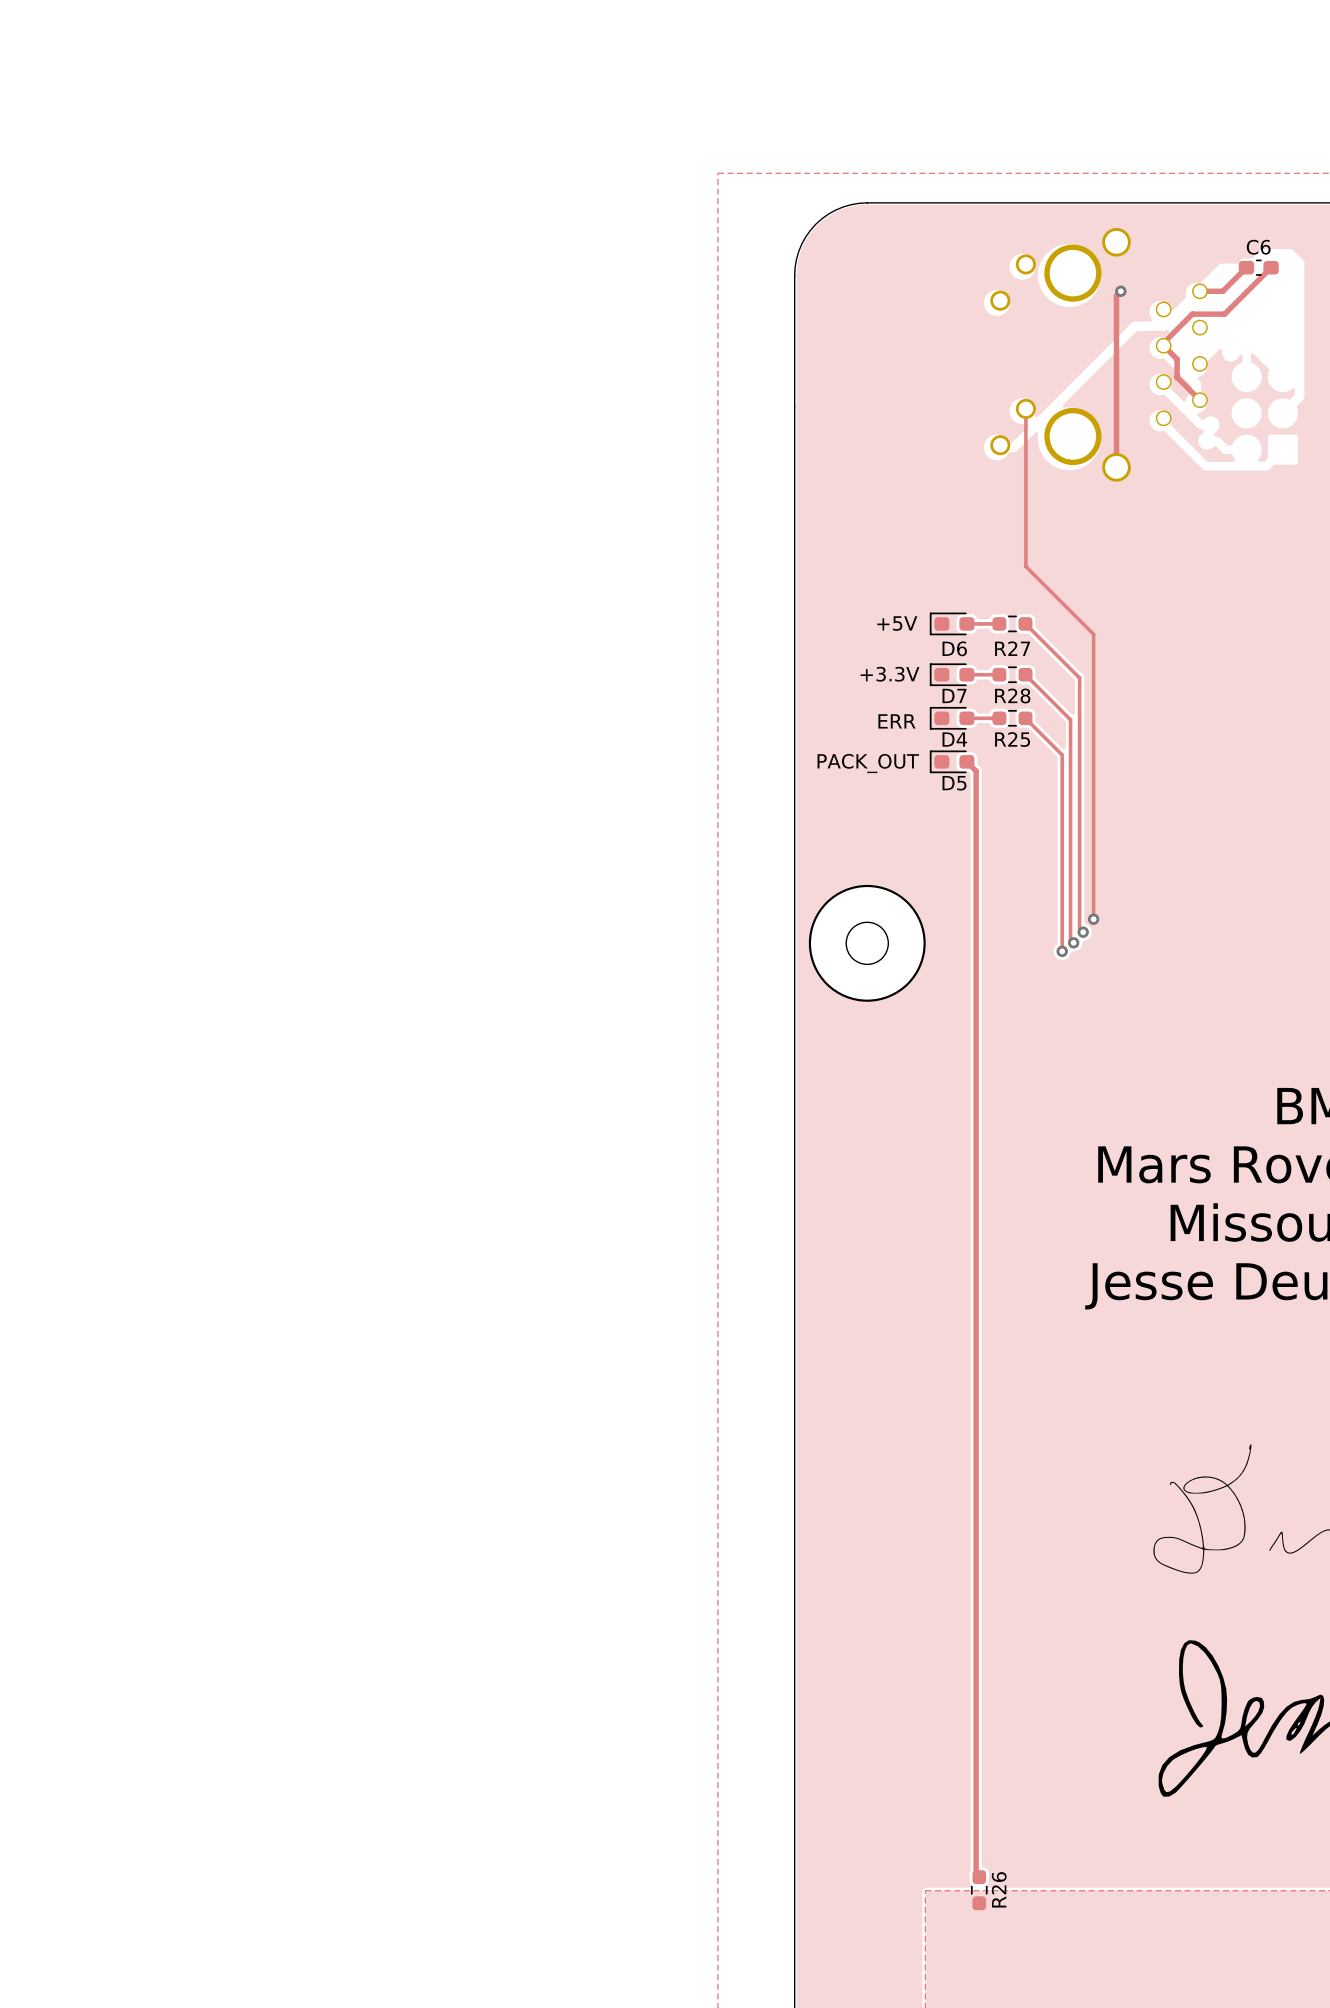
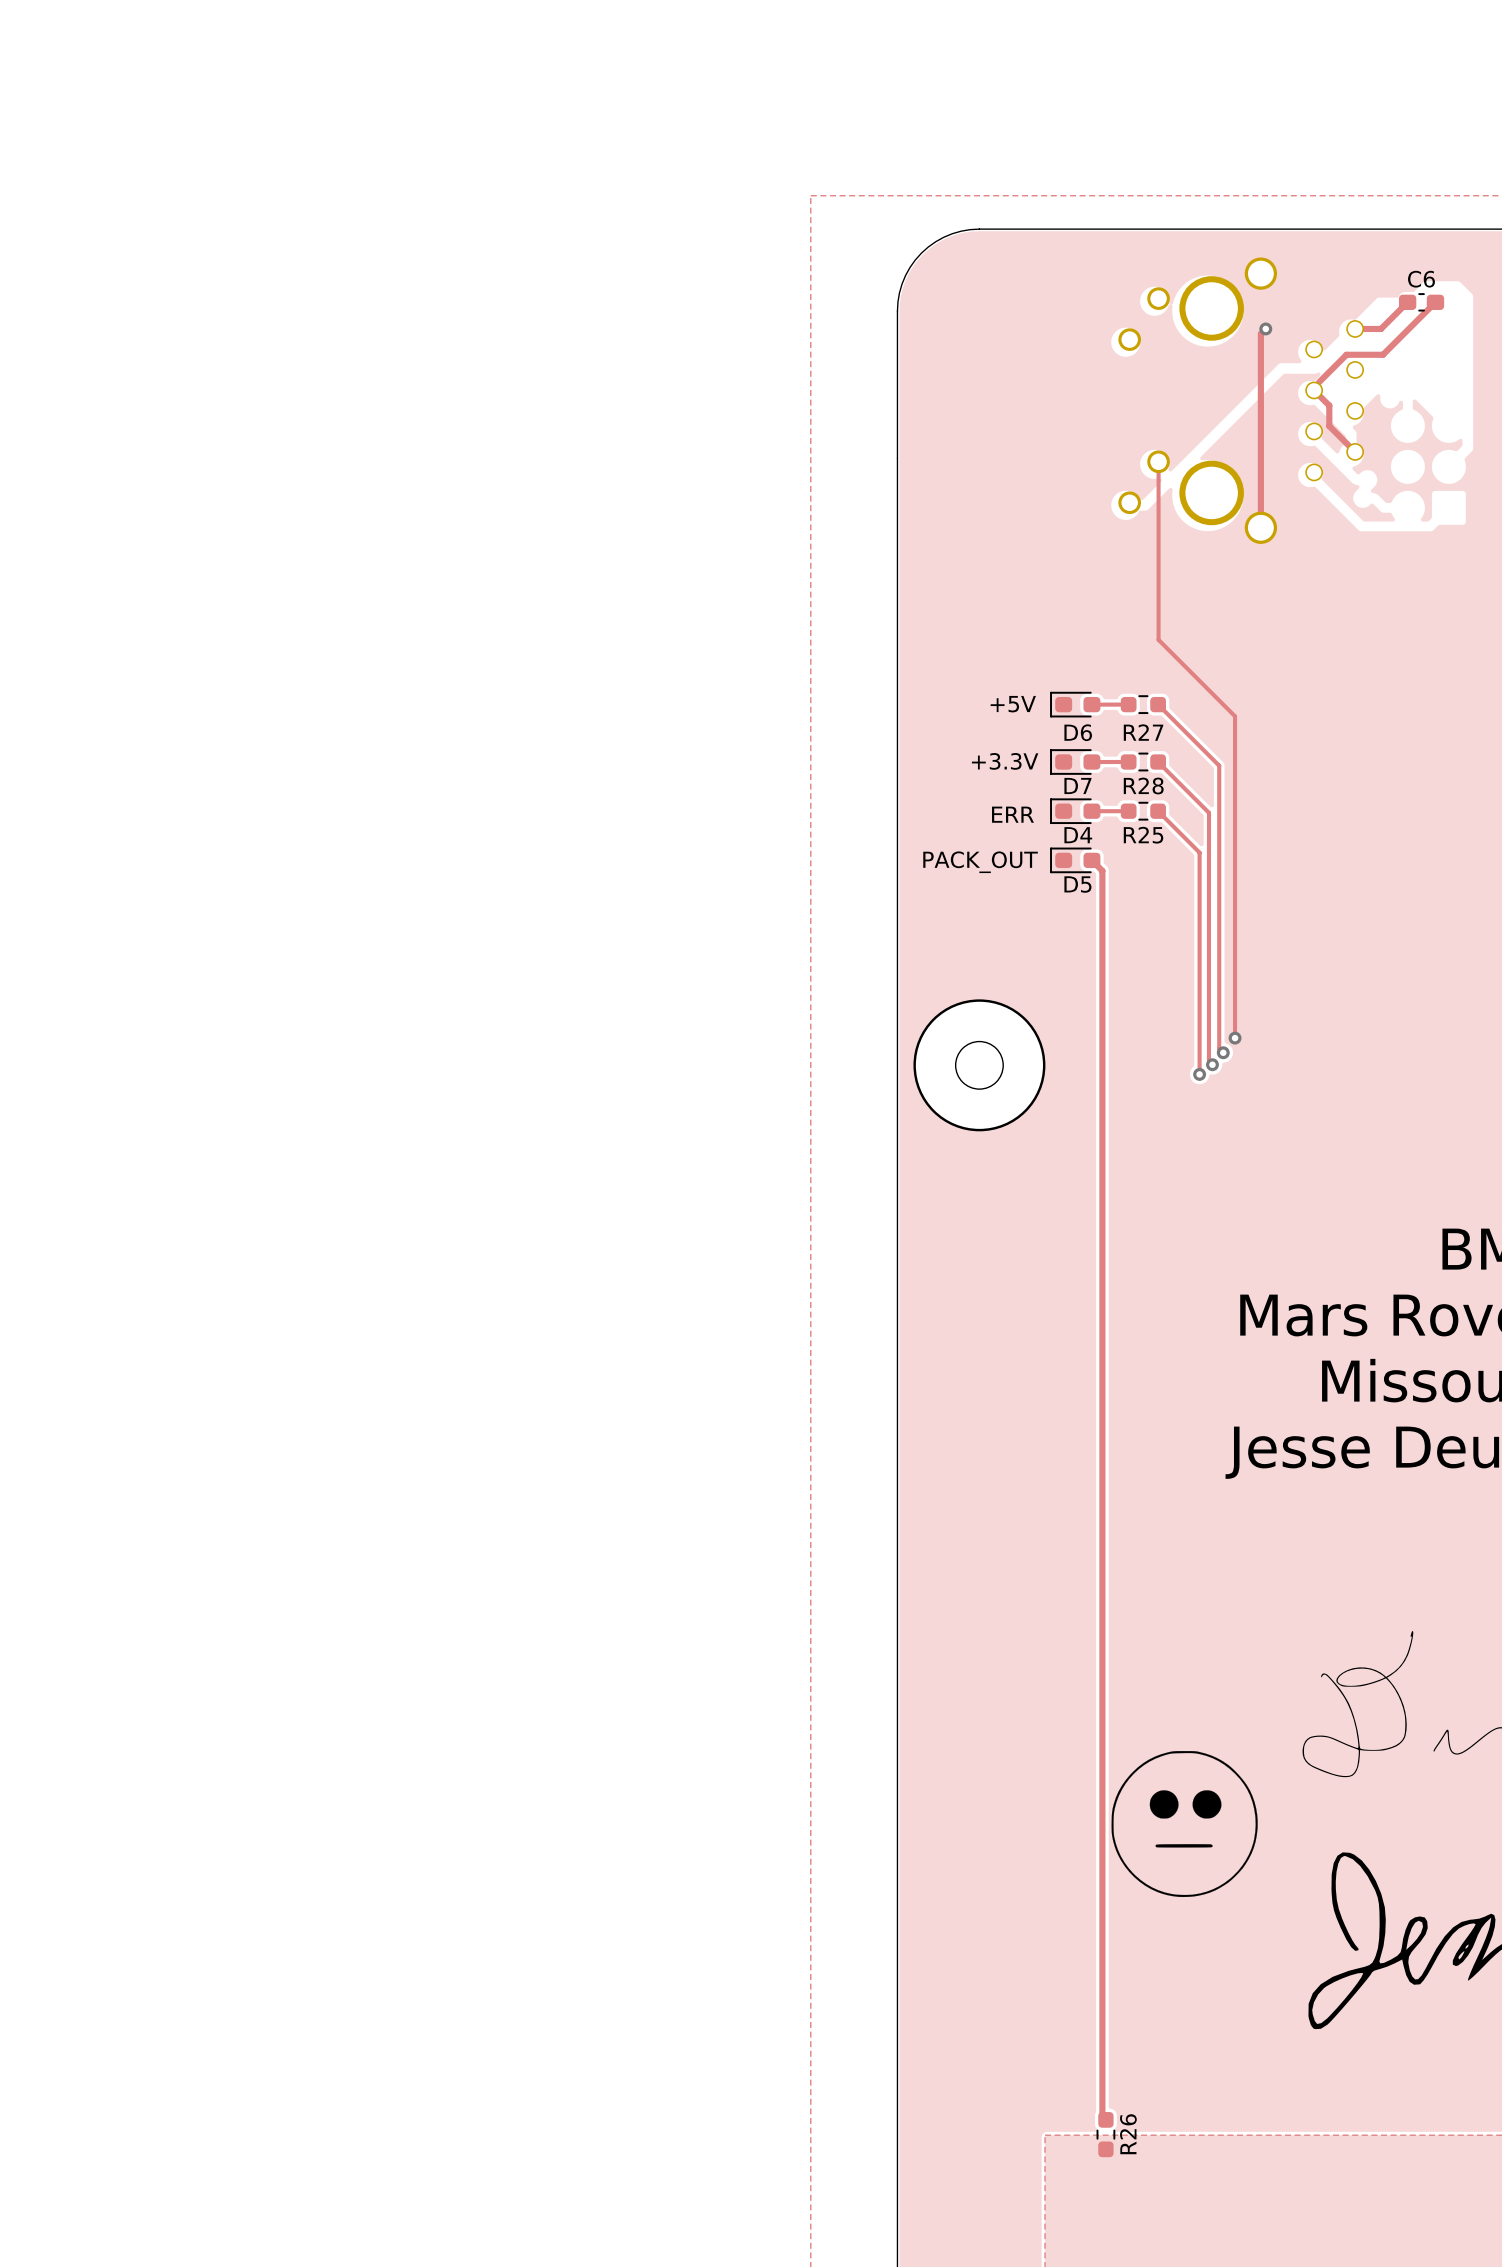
drawing: none -> [1111, 1751, 1258, 1898]

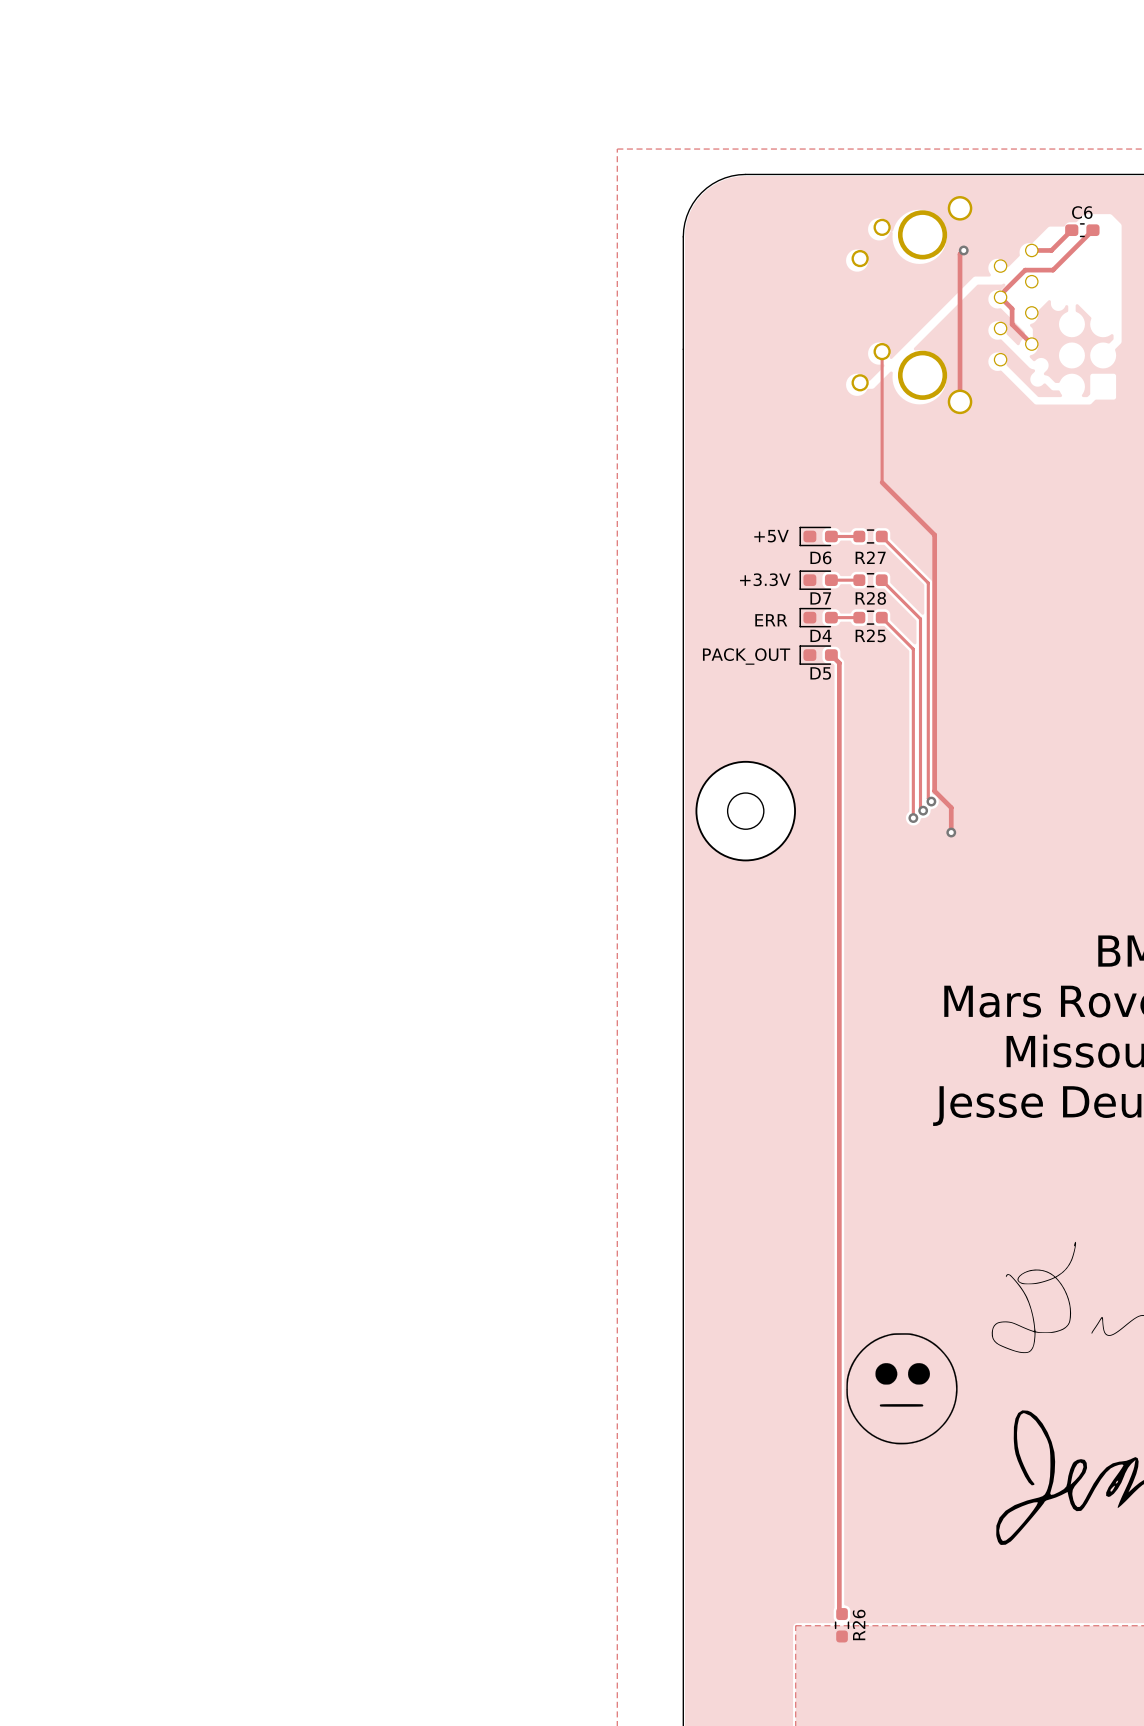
track: (1158, 633) (1158, 639) (1235, 716) (1235, 1038) -> (882, 482) (934, 535) (934, 791) (951, 807) (951, 832)
via position: (1235, 1038) -> (951, 832)

